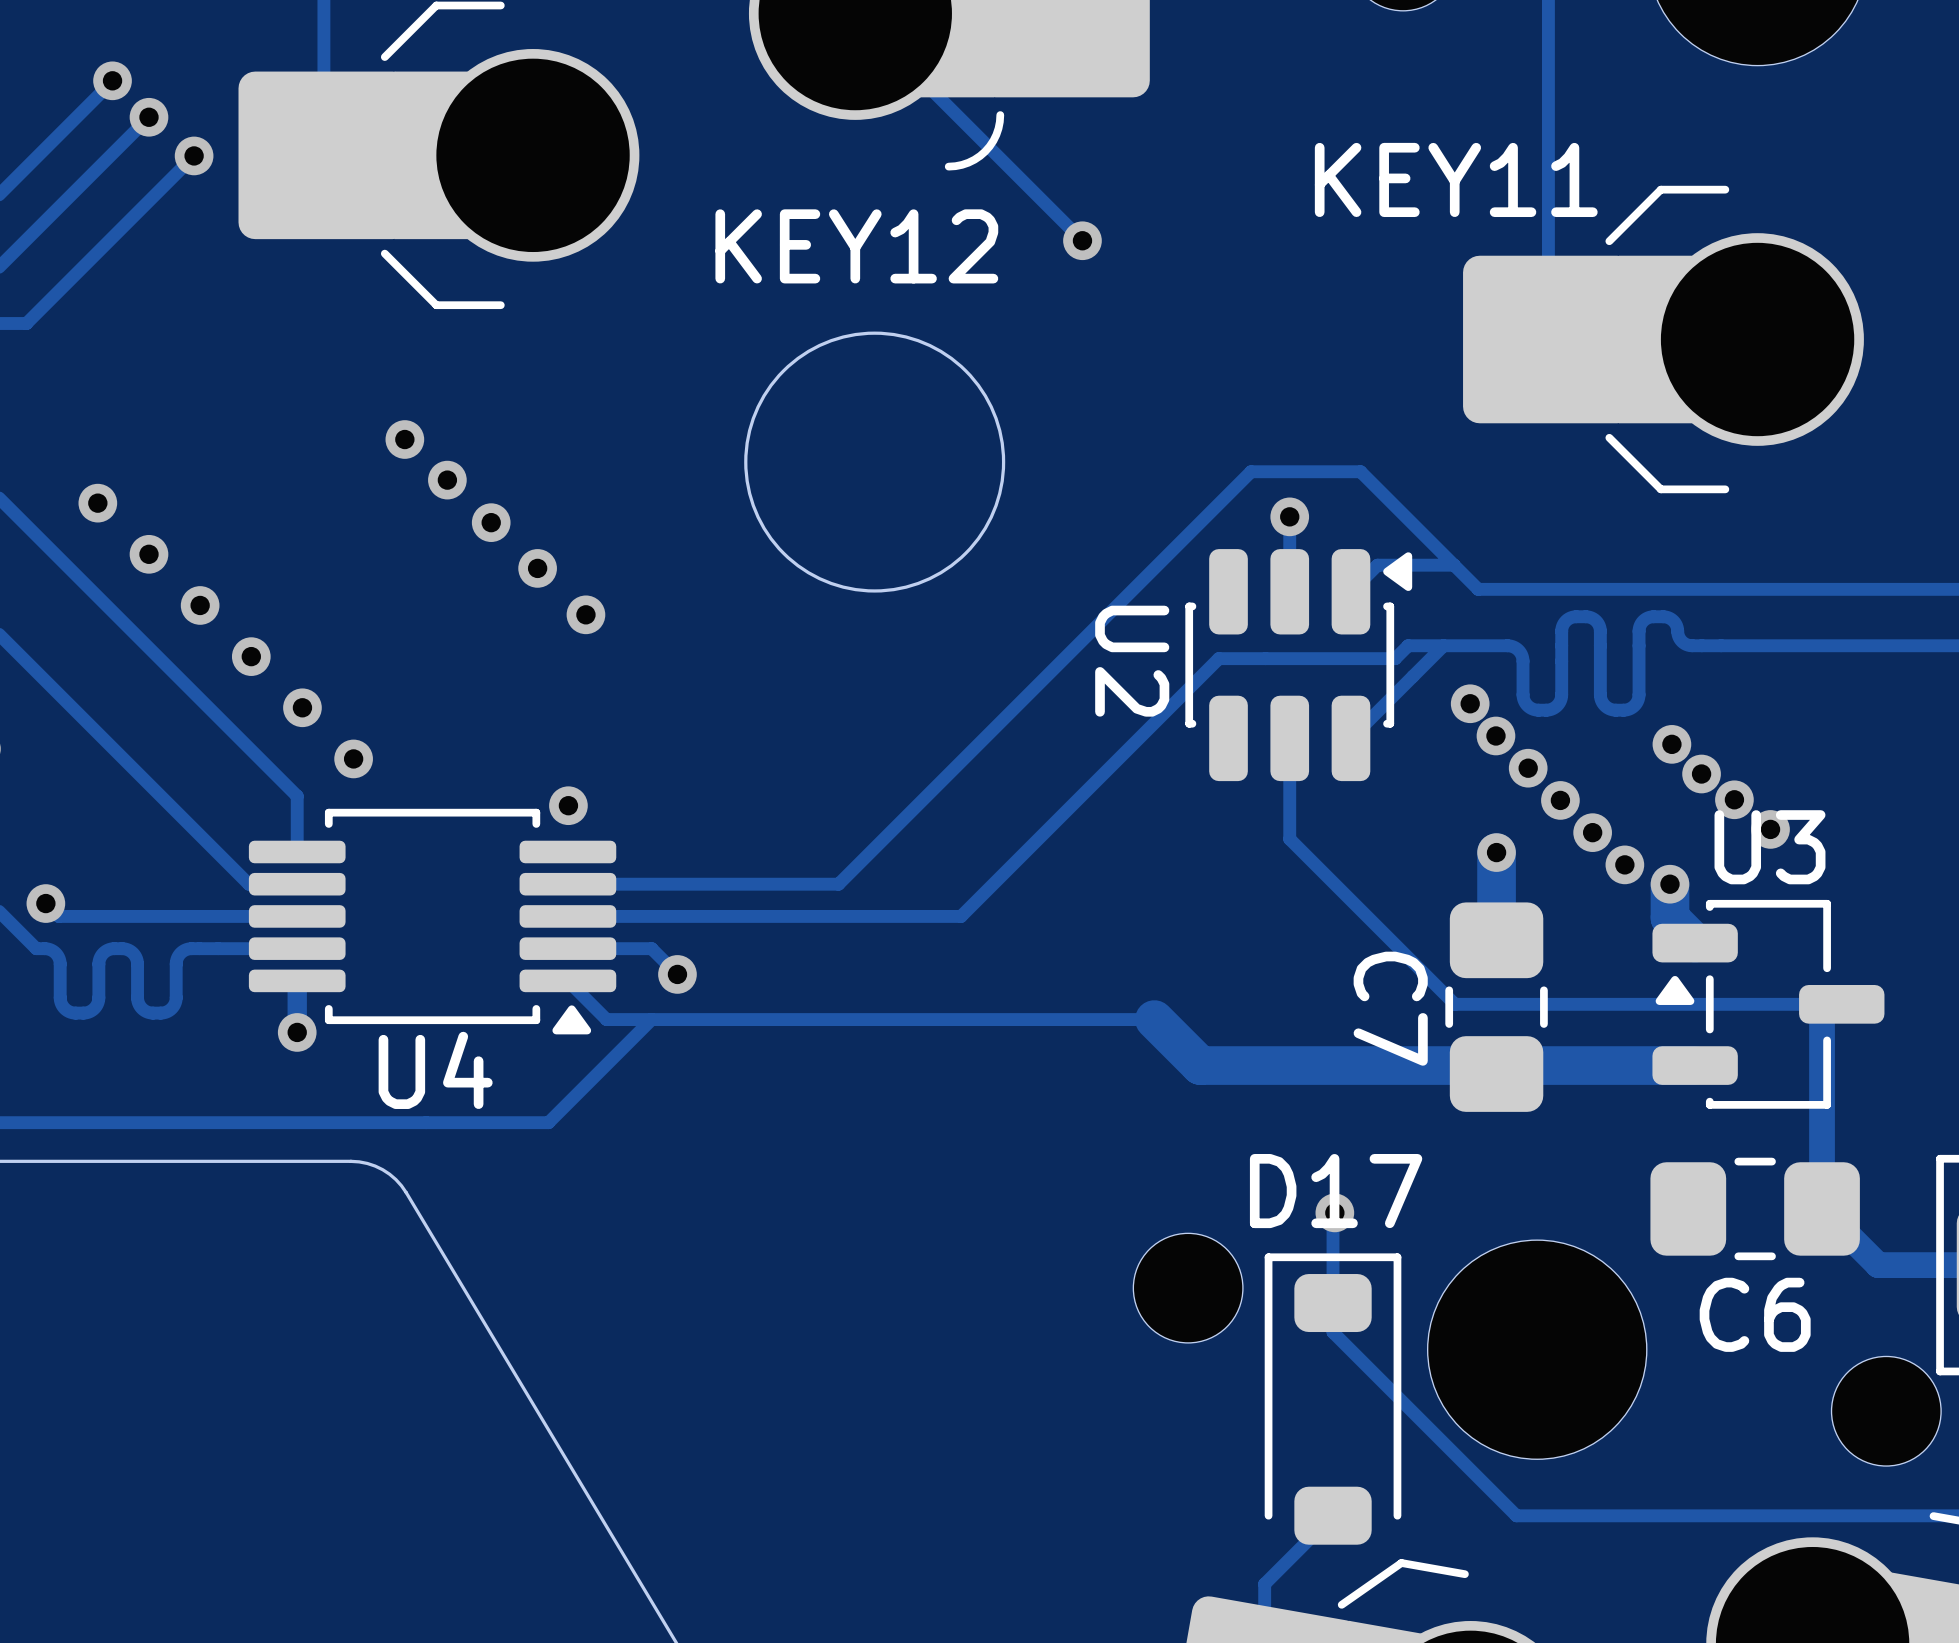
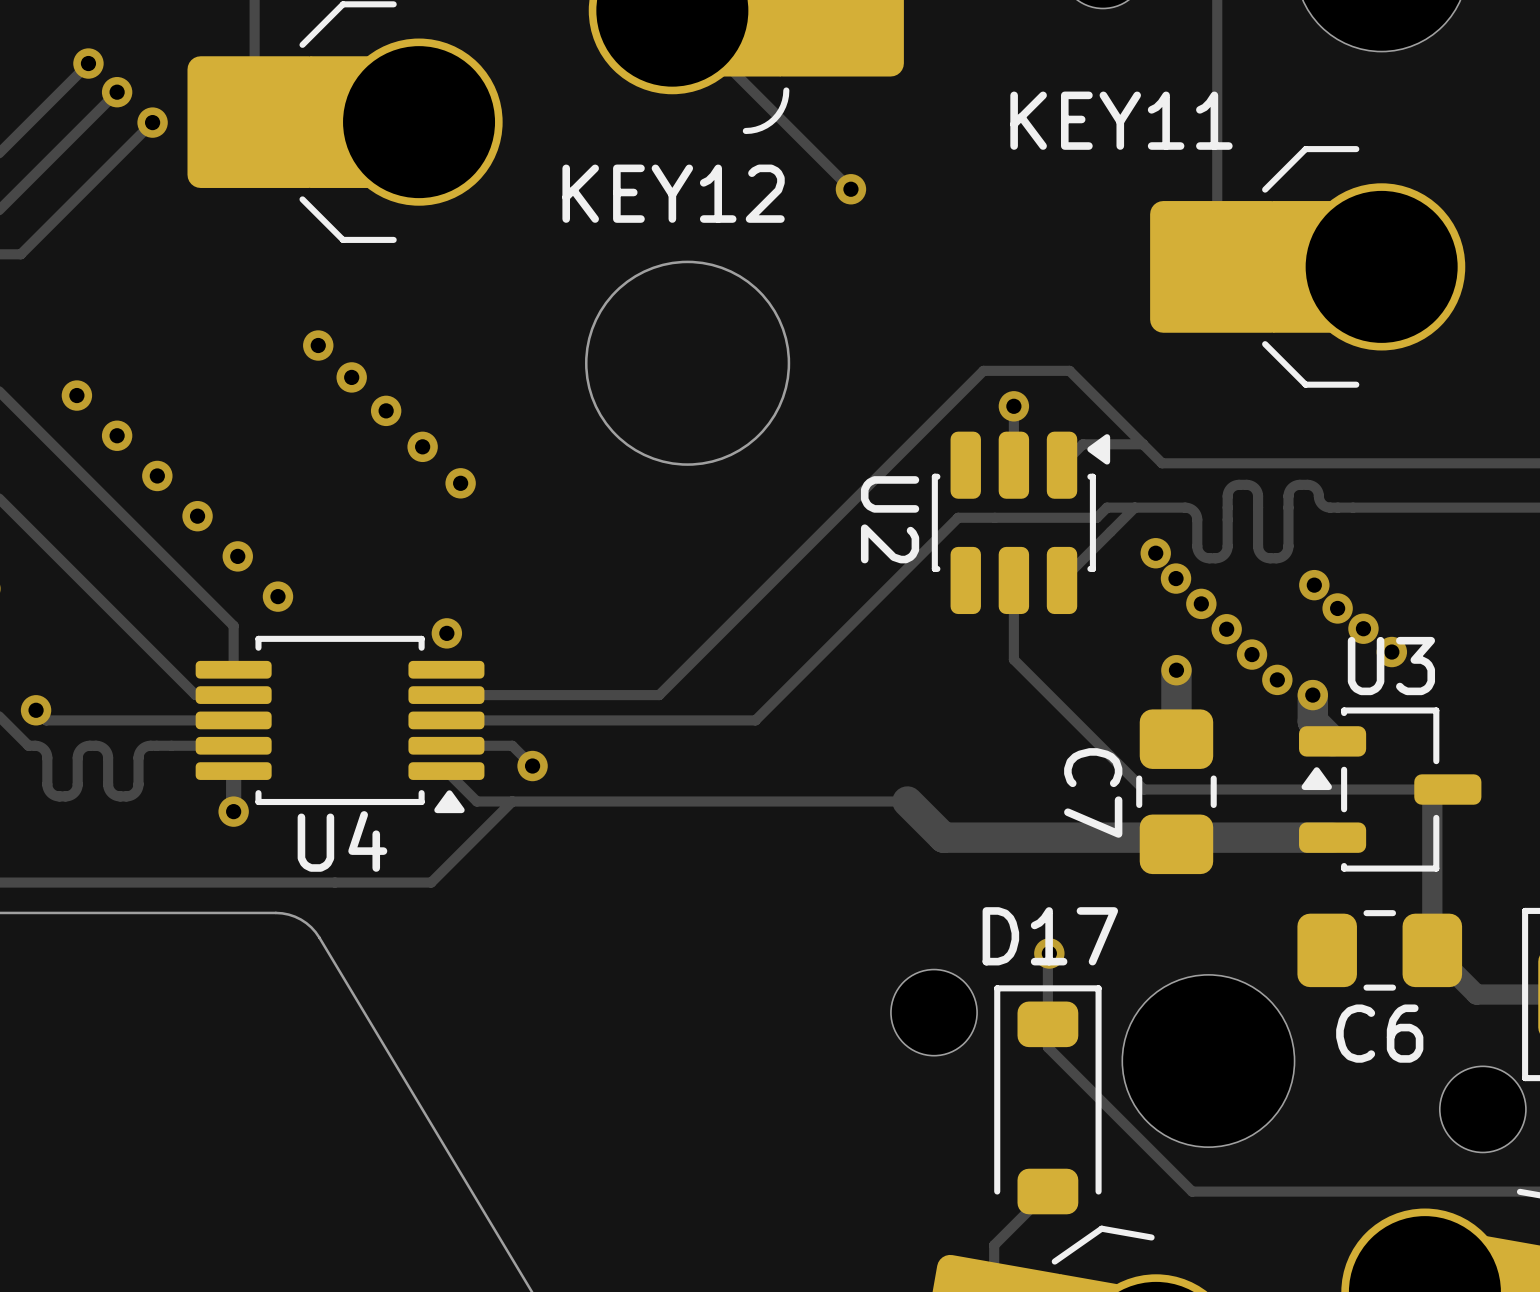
KEY11 name position: KEY11 (1456, 179) -> KEY11 (1121, 120)

